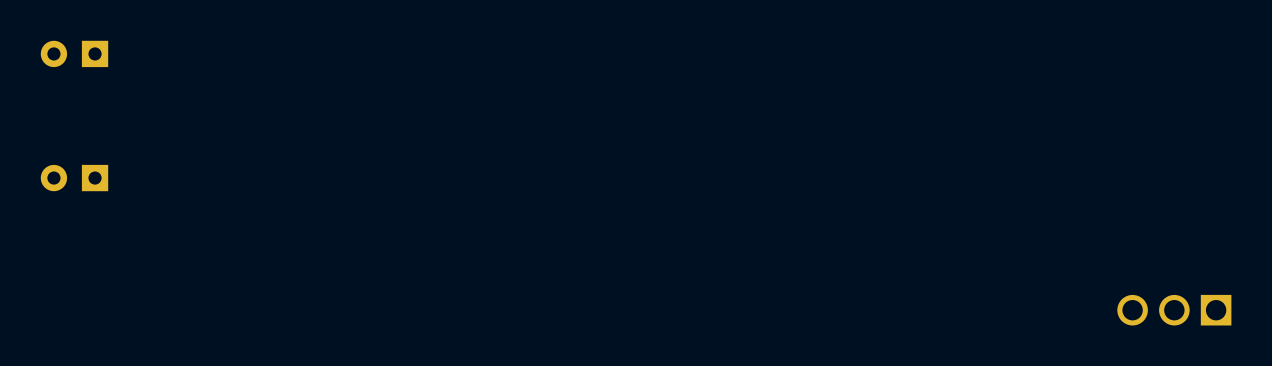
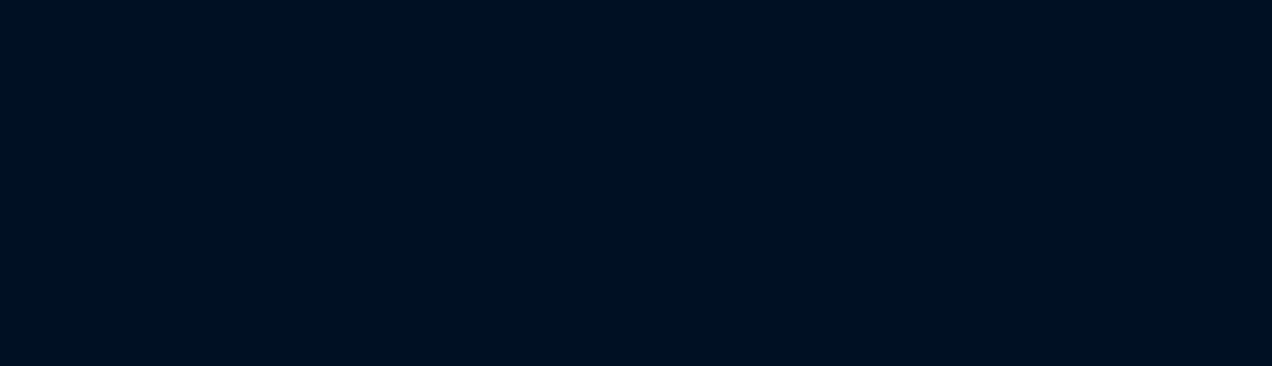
part: (74, 53) -> none
part: (74, 178) -> none
part: (1174, 310) -> none

